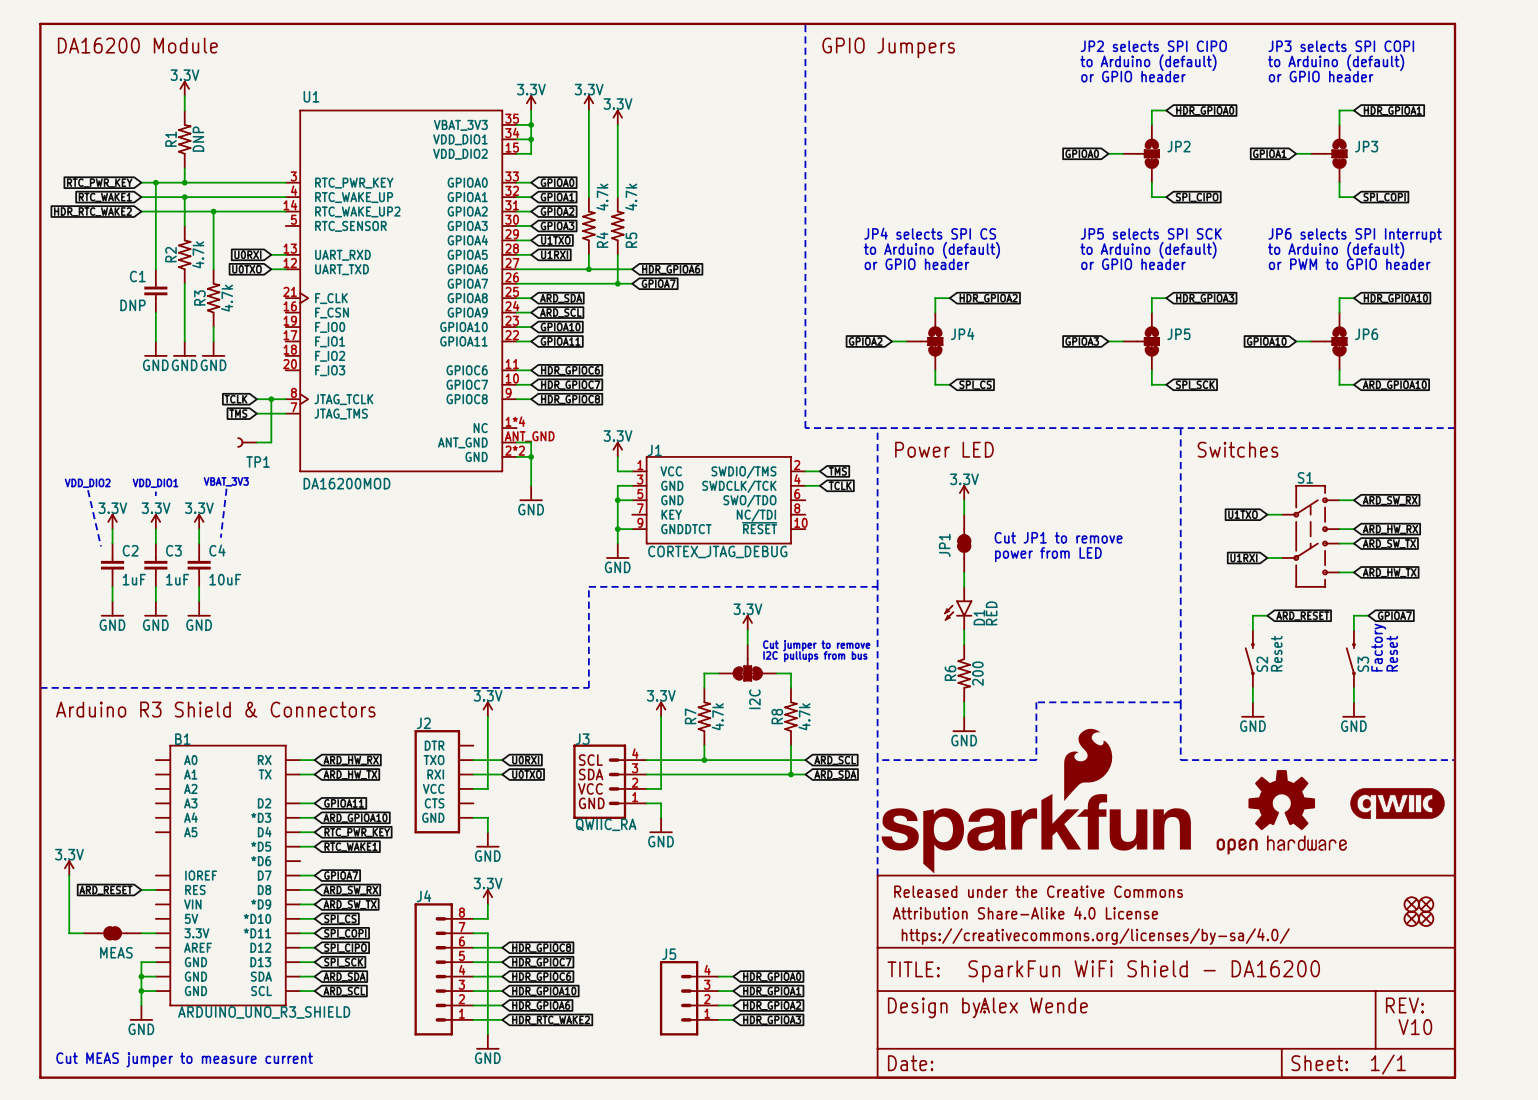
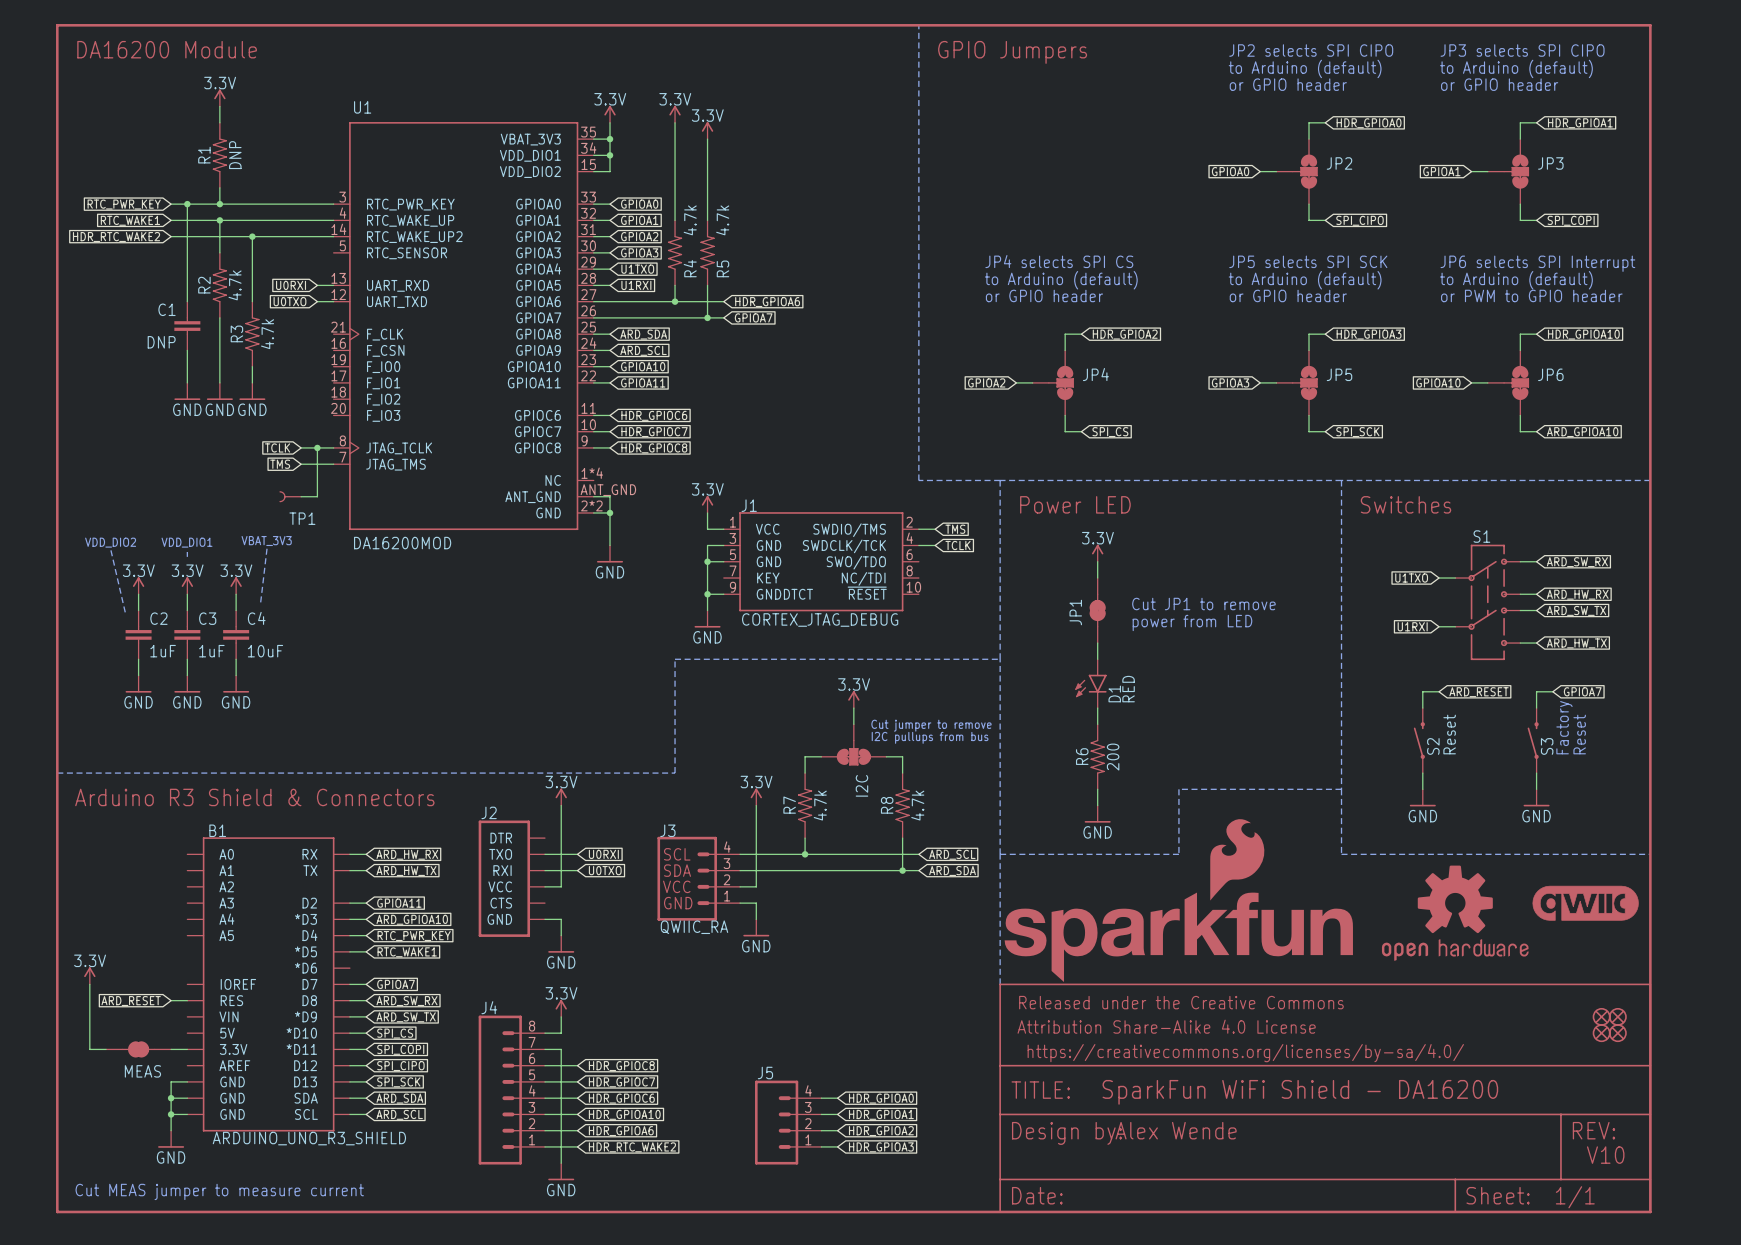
text: JP3 selects SPI COPI (1341, 46) -> JP3 selects SPI CIPO (1522, 50)

